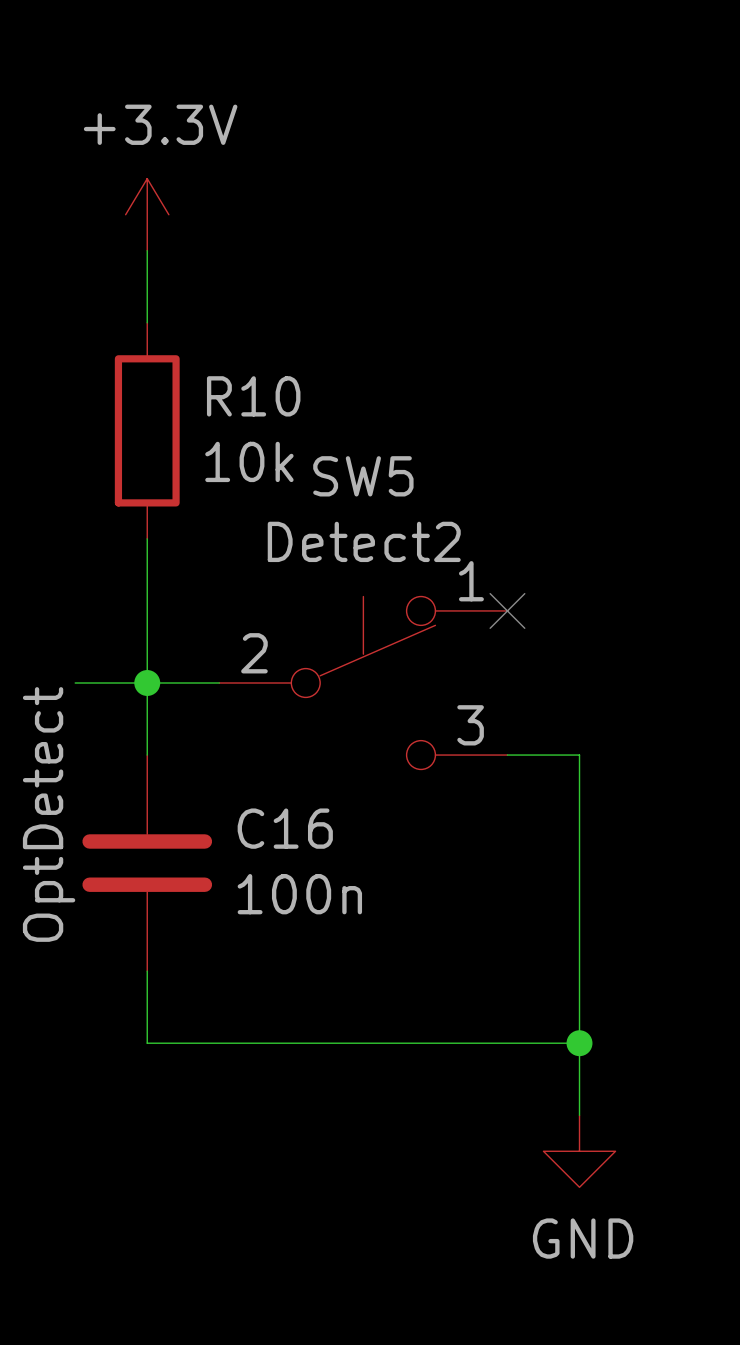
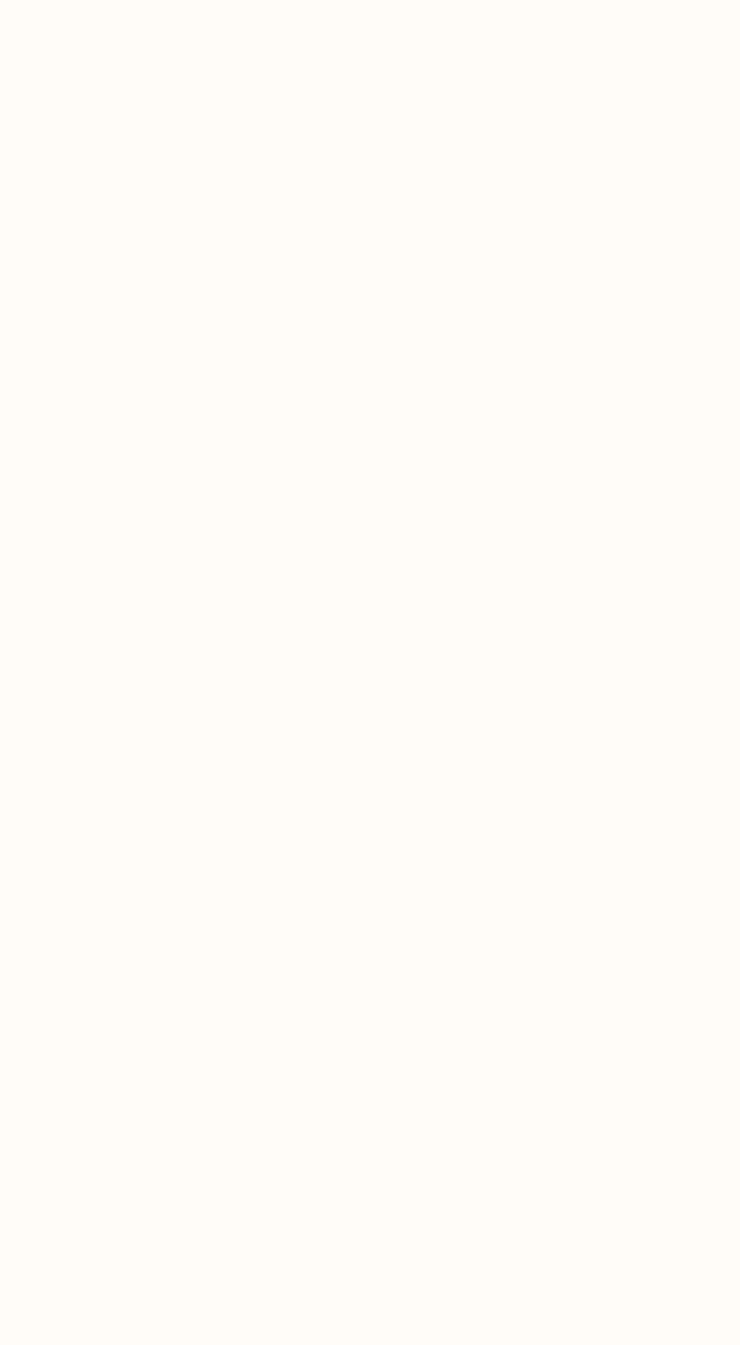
power symbol: +3.3V (147, 214) -> none
wire: (147, 250) (147, 322) -> none
R10: 10k (147, 430) -> none
wire: (147, 538) (147, 755) -> none
no-connect mark: (507, 610) -> none
wire: (75, 683) (219, 683) -> none
junction: (147, 683) -> none
SW5: Detect2 (363, 683) -> none
wire: (507, 755) (579, 755) (579, 1115) -> none
label: OptDetect (49, 814) -> none
C16: 100n (147, 863) -> none
wire: (147, 971) (147, 1043) (579, 1043) -> none
junction: (579, 1043) -> none
power symbol: GND (579, 1151) -> none

